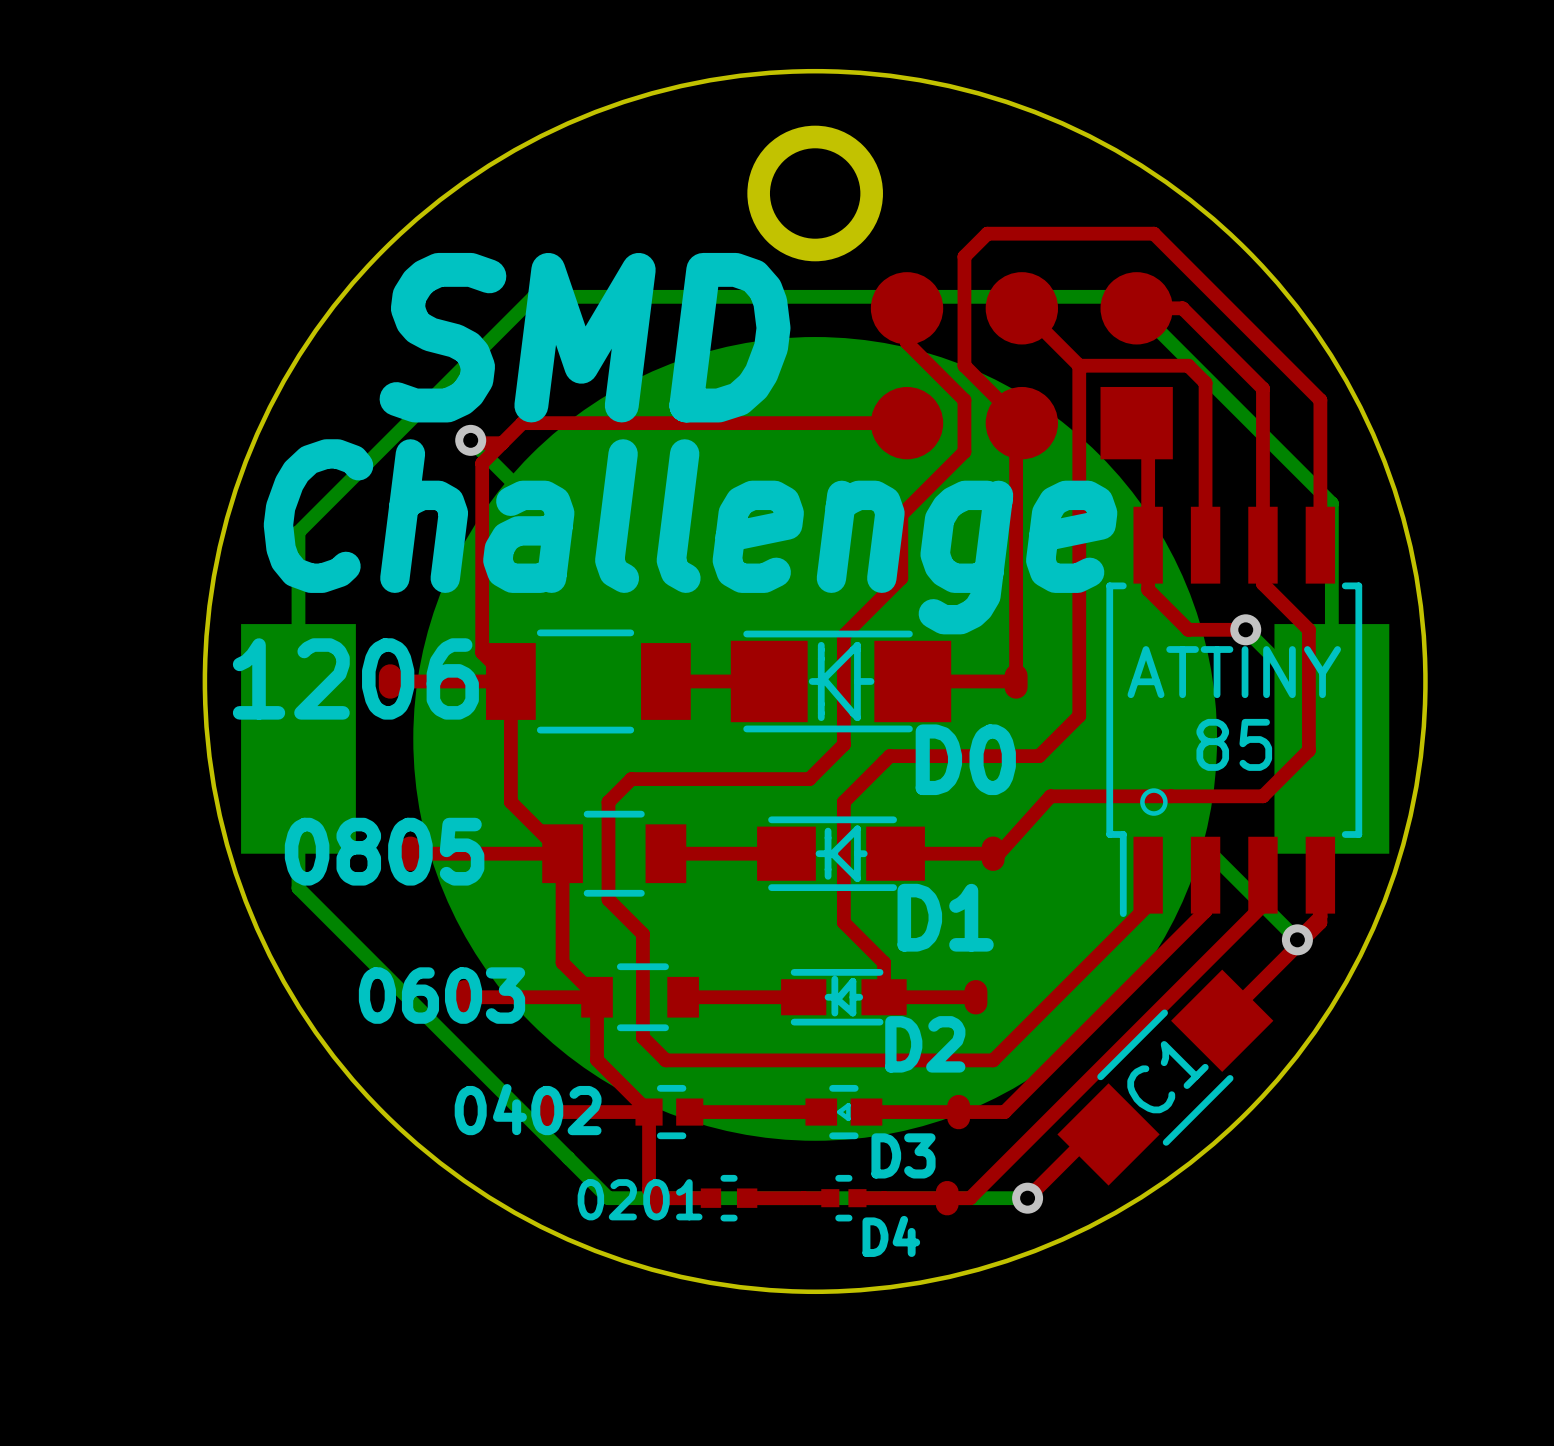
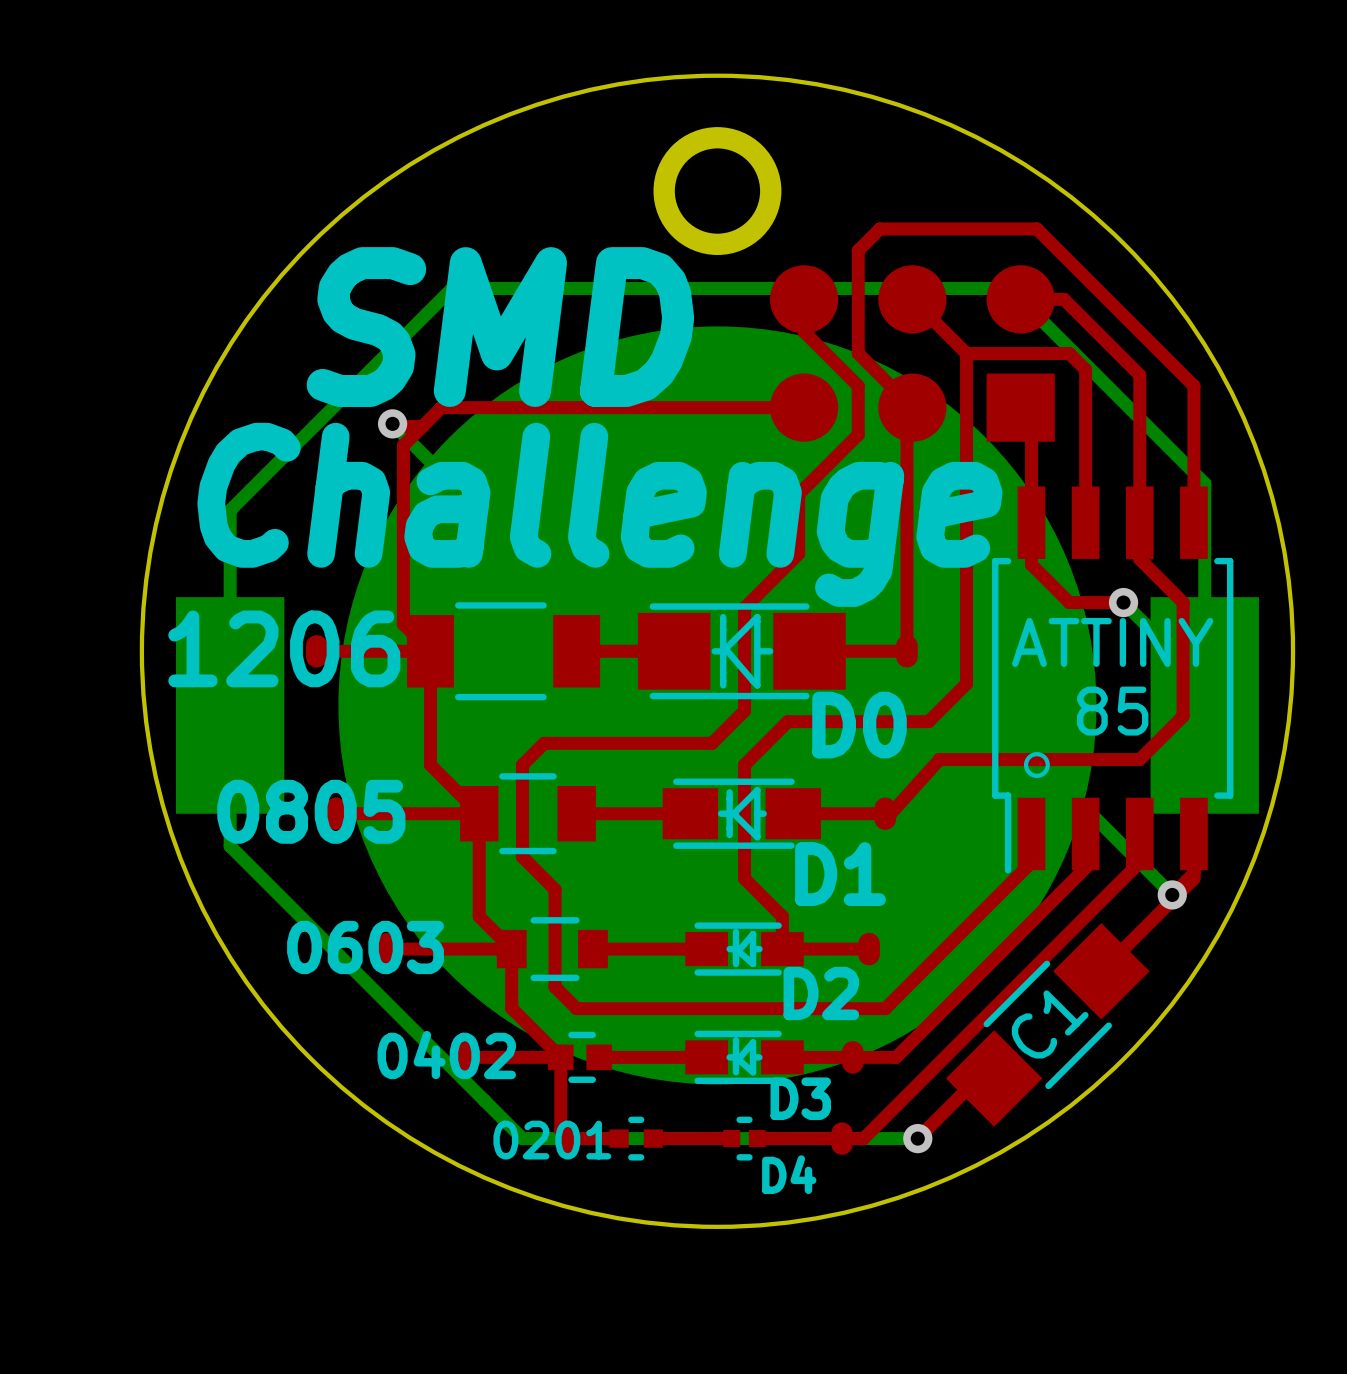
D3 footprint: [805, 1084, 883, 1140] -> [685, 1030, 804, 1085]

